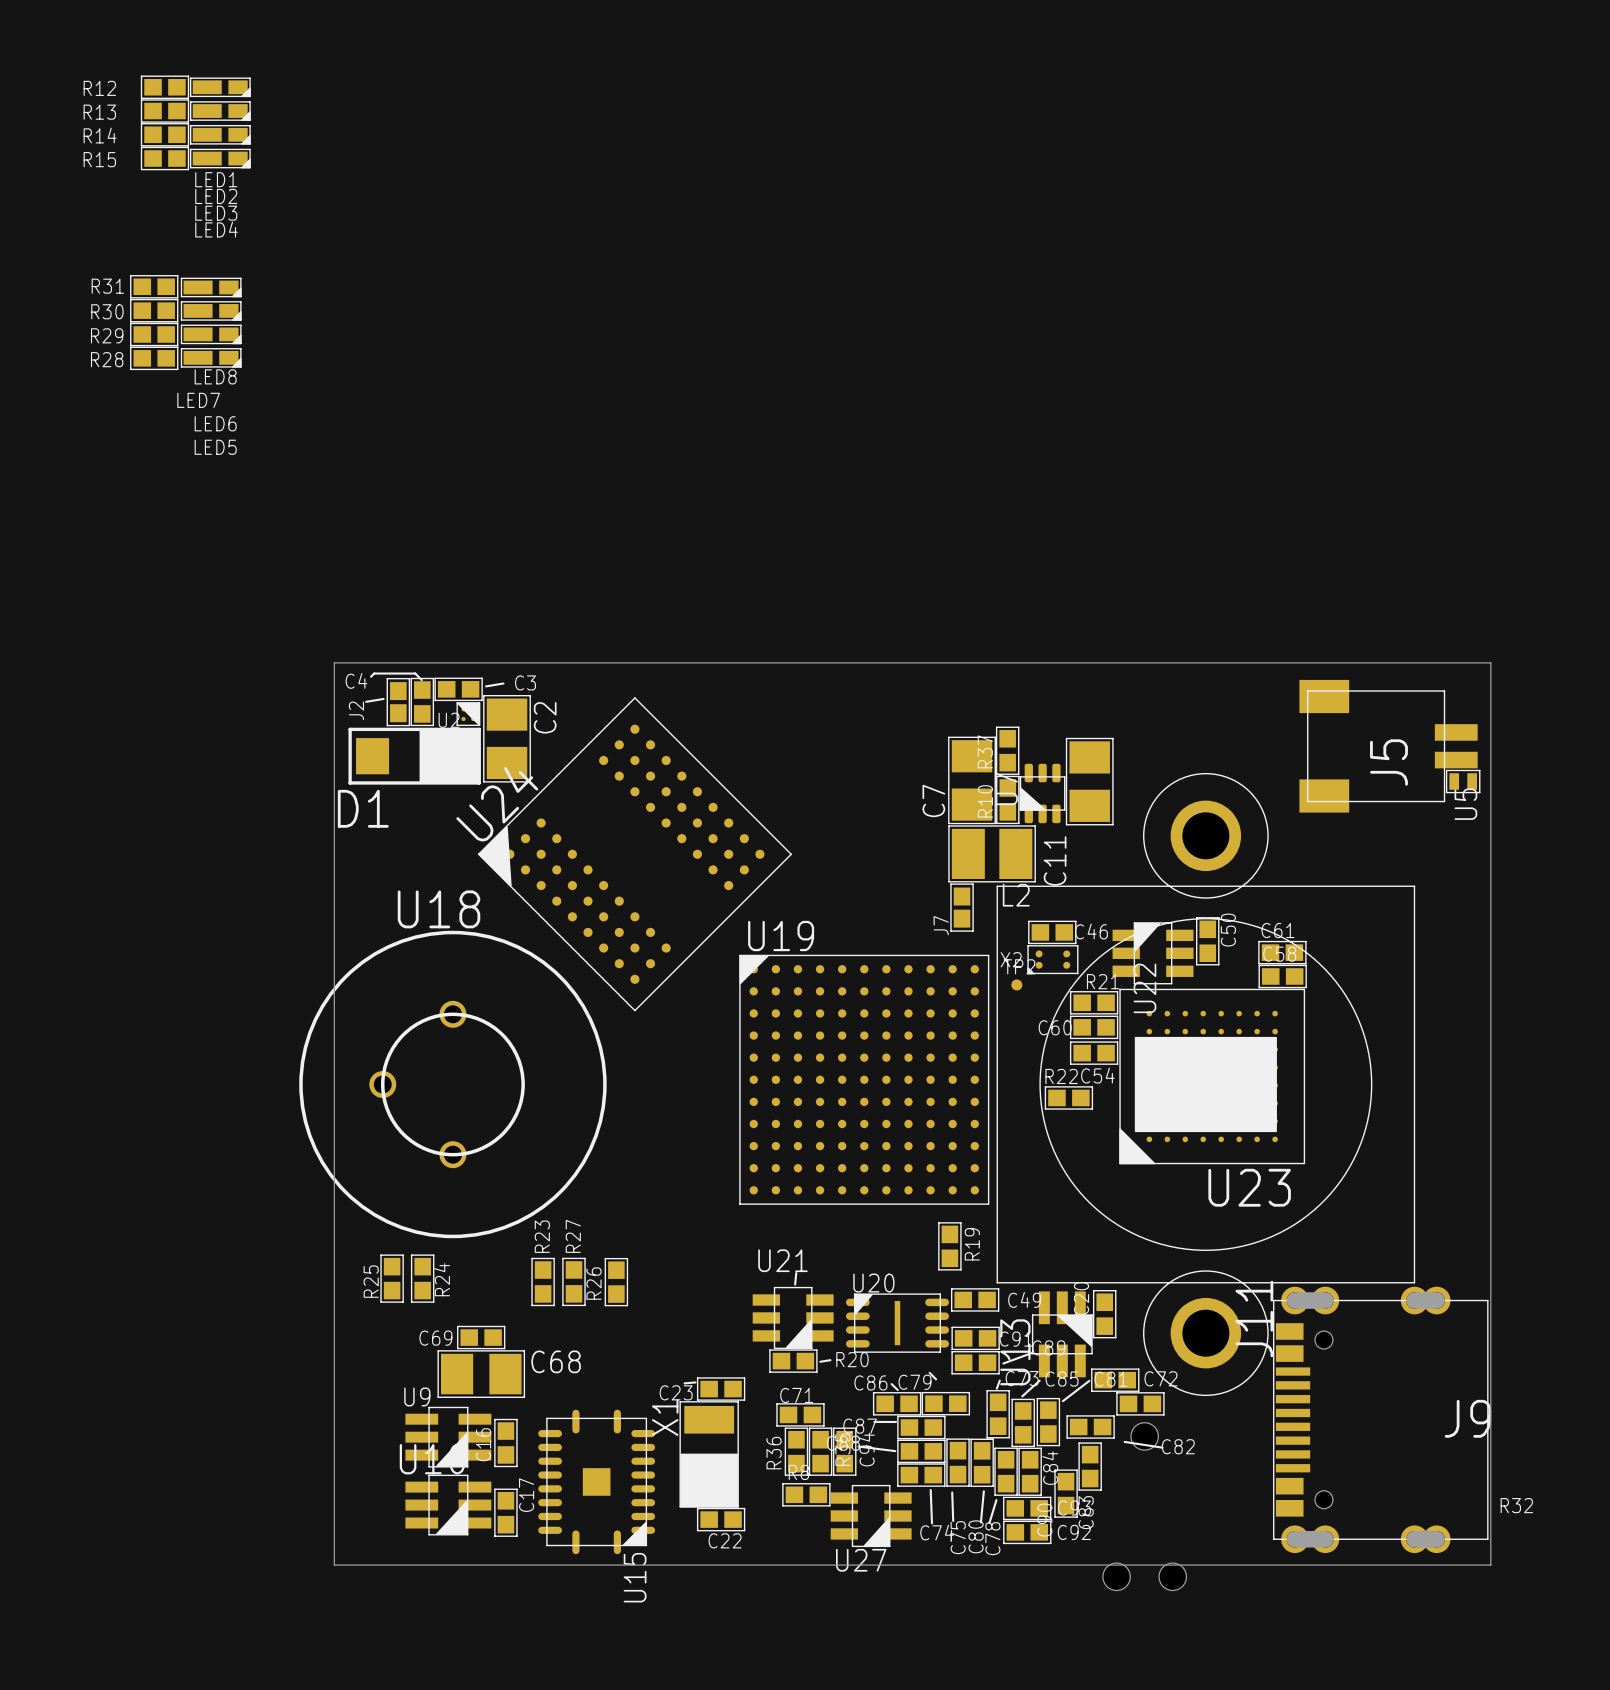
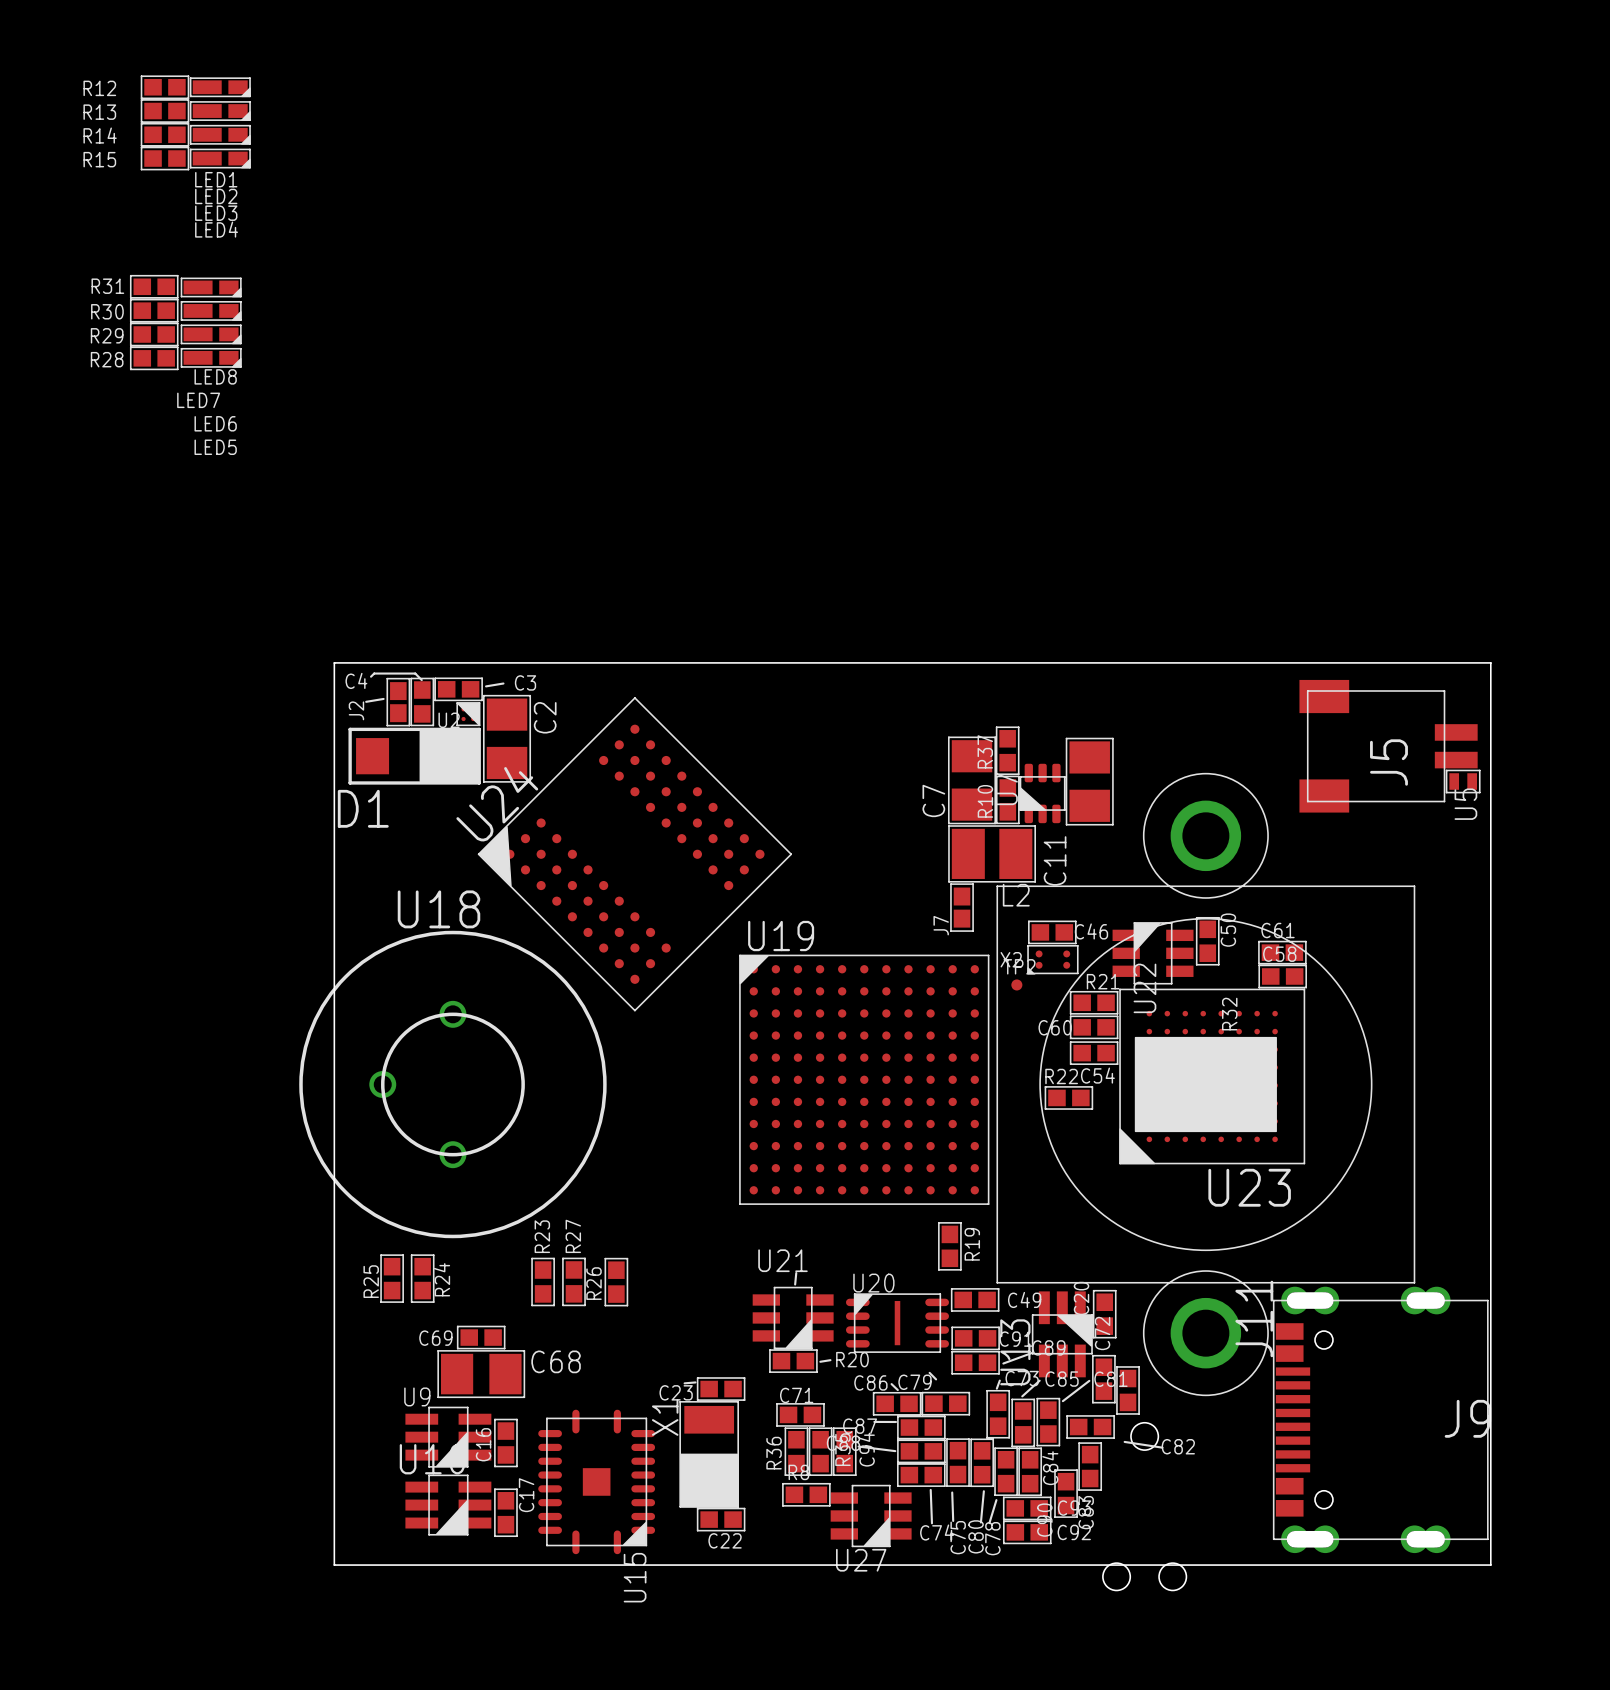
C72 name position: C72 (1160, 1378) -> C72 (1102, 1333)
C72 rotation: 0° (1115, 1380) -> 90° clockwise (1103, 1379)
R32 rotation: 0° (1140, 1403) -> 90° clockwise (1128, 1390)
R32 name position: R32 (1516, 1505) -> R32 (1229, 1014)

